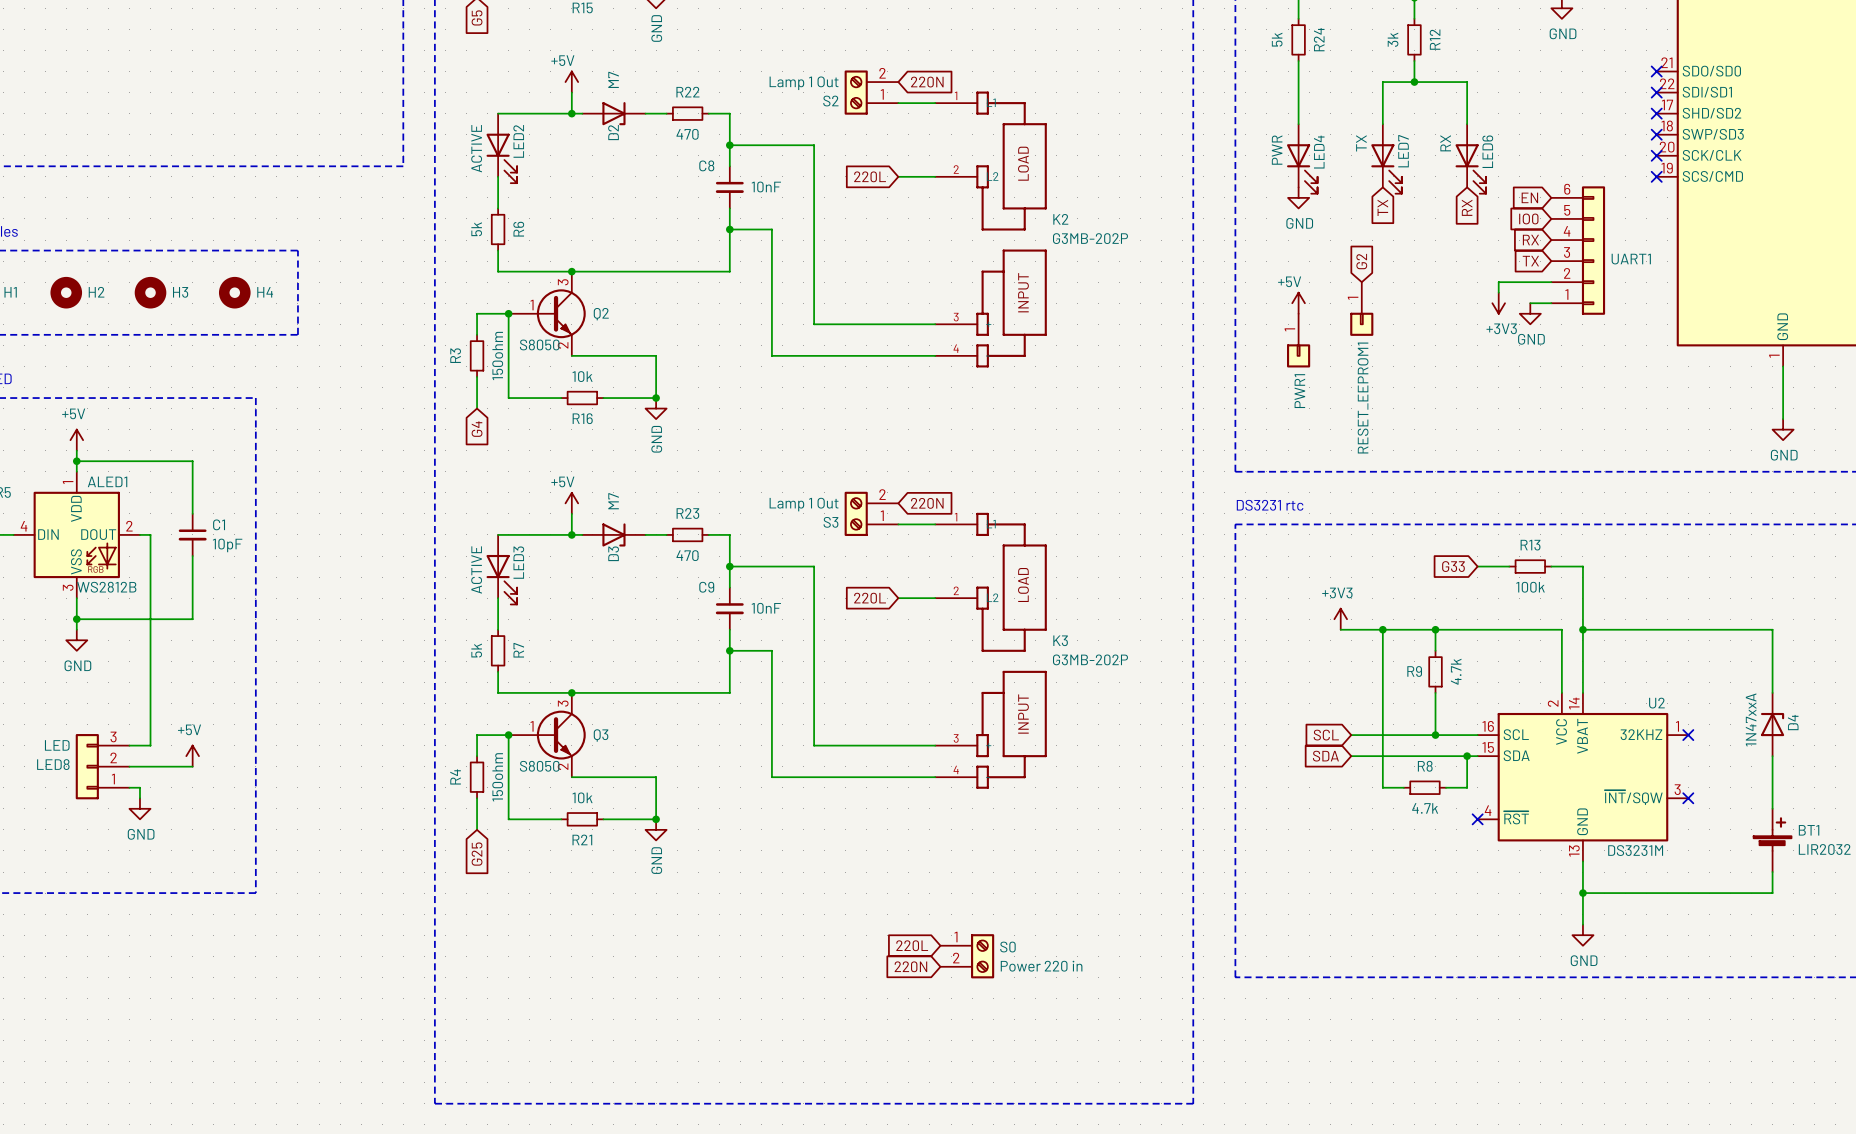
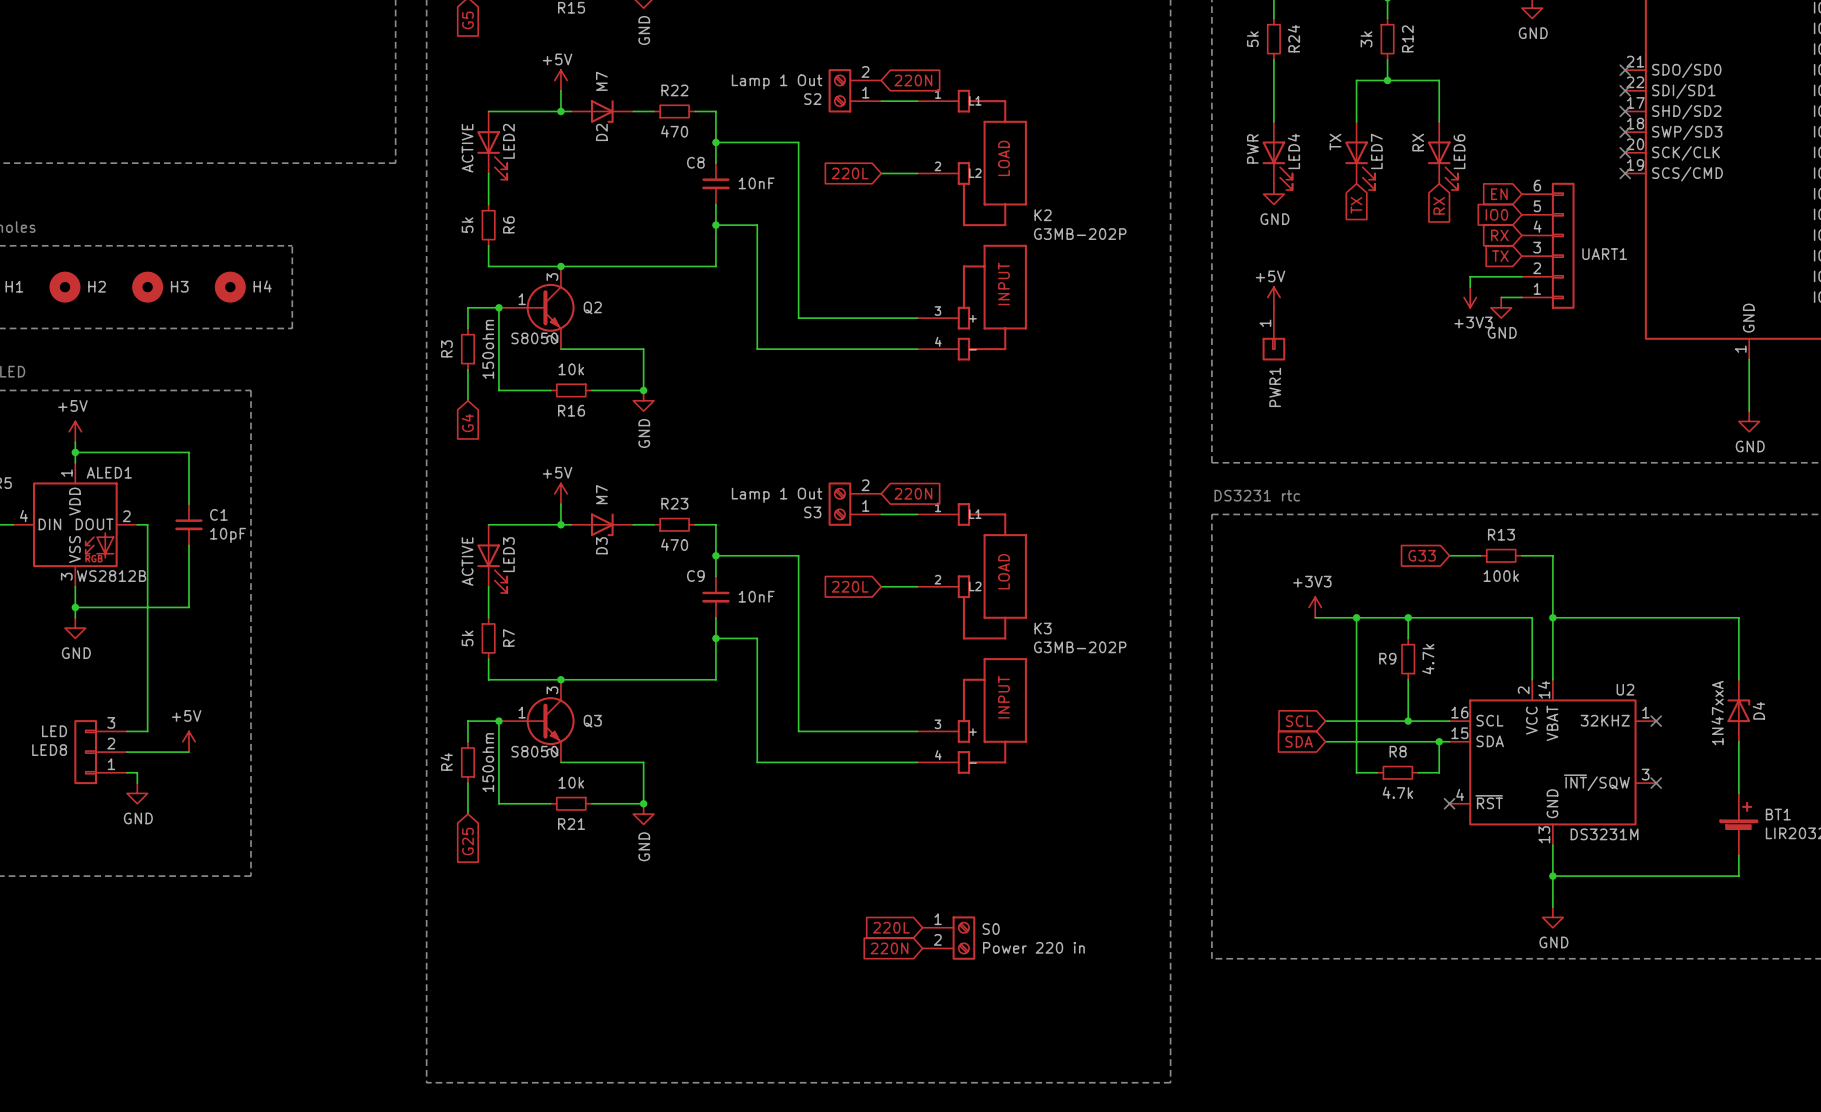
global label: G2 (1361, 261) -> none
RESET_EEPROM1: (1361, 309) -> none

